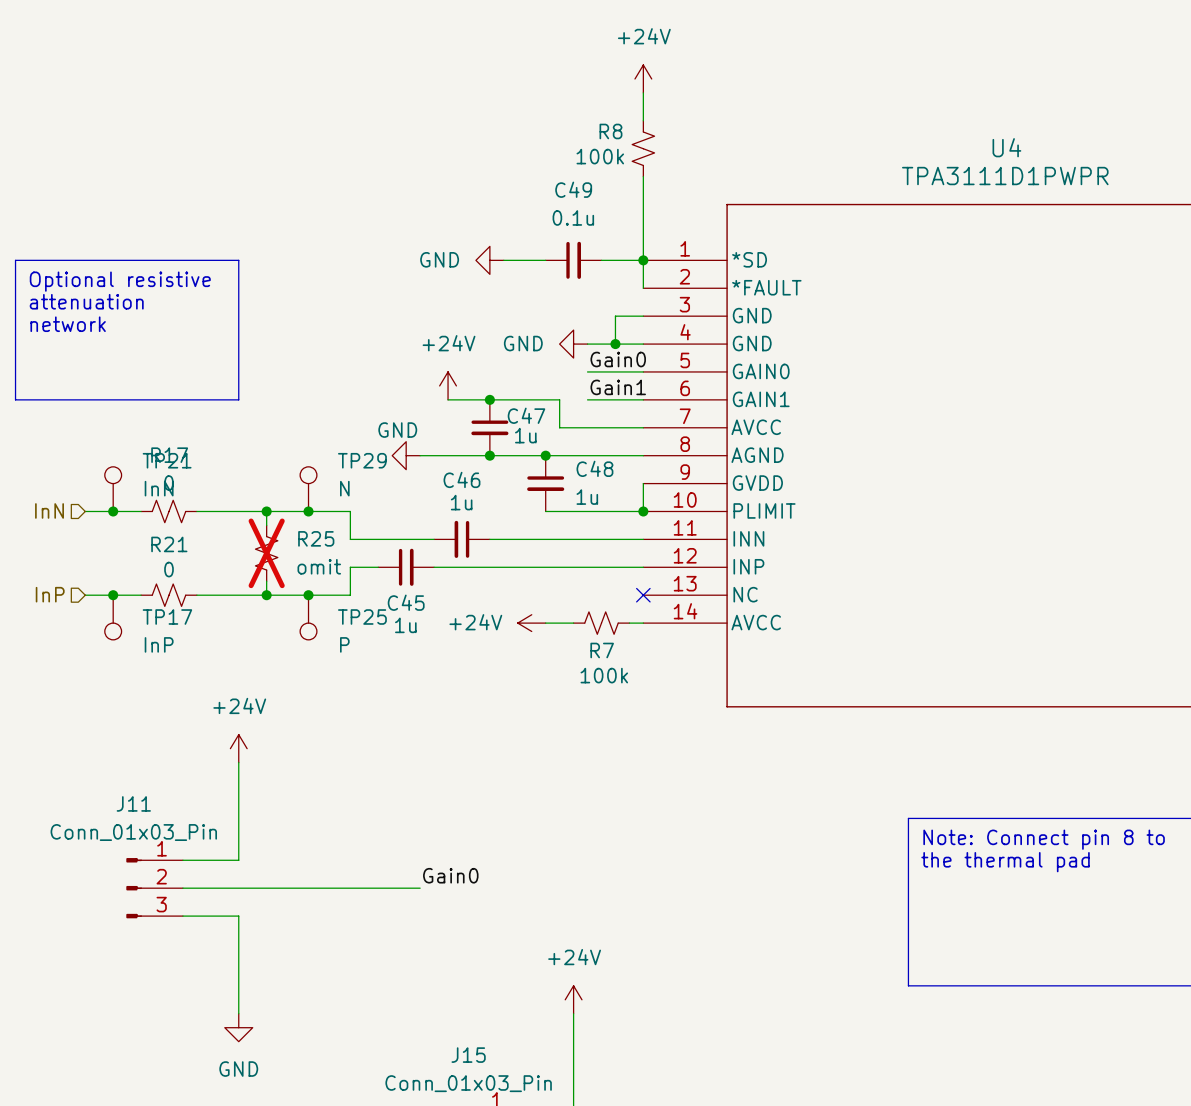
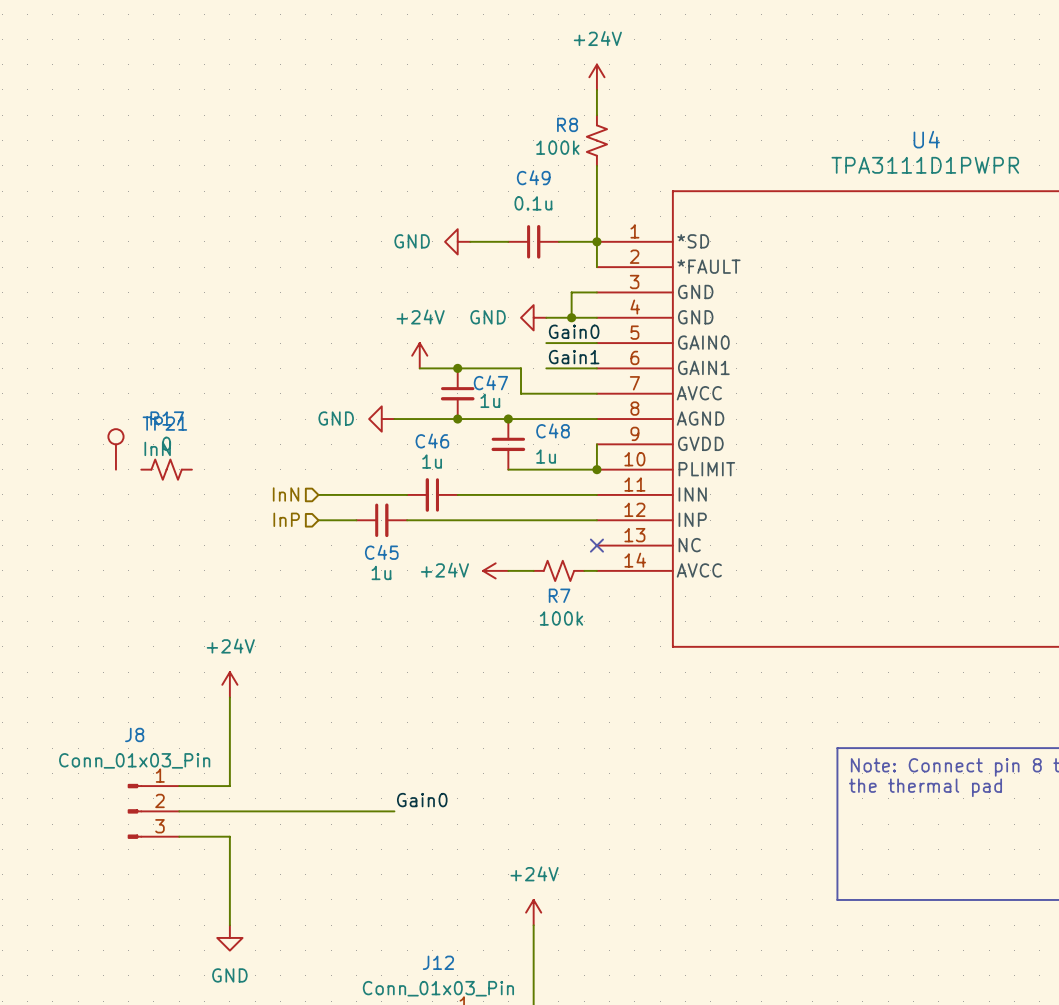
line: (15, 260) (238, 260) (238, 399) (15, 399) (15, 260) -> none
text: Optional resistive (120, 281) -> none
text: attenuation (86, 301) -> none
text: network (68, 324) -> none
power symbol text position: GND (397, 430) -> GND (336, 418)
TP29: N (308, 489) -> none
hierarchical label position: InN (49, 510) -> InN (286, 494)
wire: (85, 511) (141, 511) -> none
junction: (113, 511) -> none
wire: (196, 511) (350, 511) (350, 539) -> (318, 494) (331, 494)
wire: (266, 511) (266, 525) -> none
junction: (266, 511) -> none
junction: (308, 511) -> none
R25: omit (266, 553) -> none
wire: (350, 567) (350, 595) (196, 595) -> (331, 520) (318, 520)
wire: (266, 581) (266, 595) -> none
hierarchical label position: InP (50, 594) -> InP (286, 519)
wire: (85, 595) (141, 595) -> none
junction: (113, 595) -> none
R21: 0 (169, 595) -> none
junction: (266, 595) -> none
junction: (308, 595) -> none
TP17: InP (113, 617) -> none
TP25: P (308, 617) -> none
J11 name: J11 (133, 803) -> J8 (134, 734)
J15 name: J15 (468, 1055) -> J12 (438, 962)

